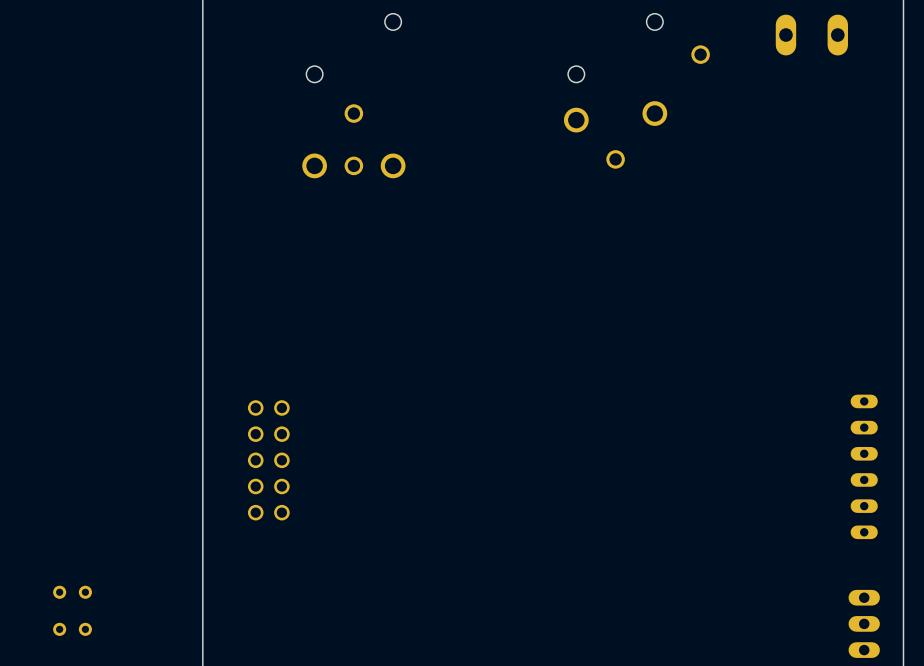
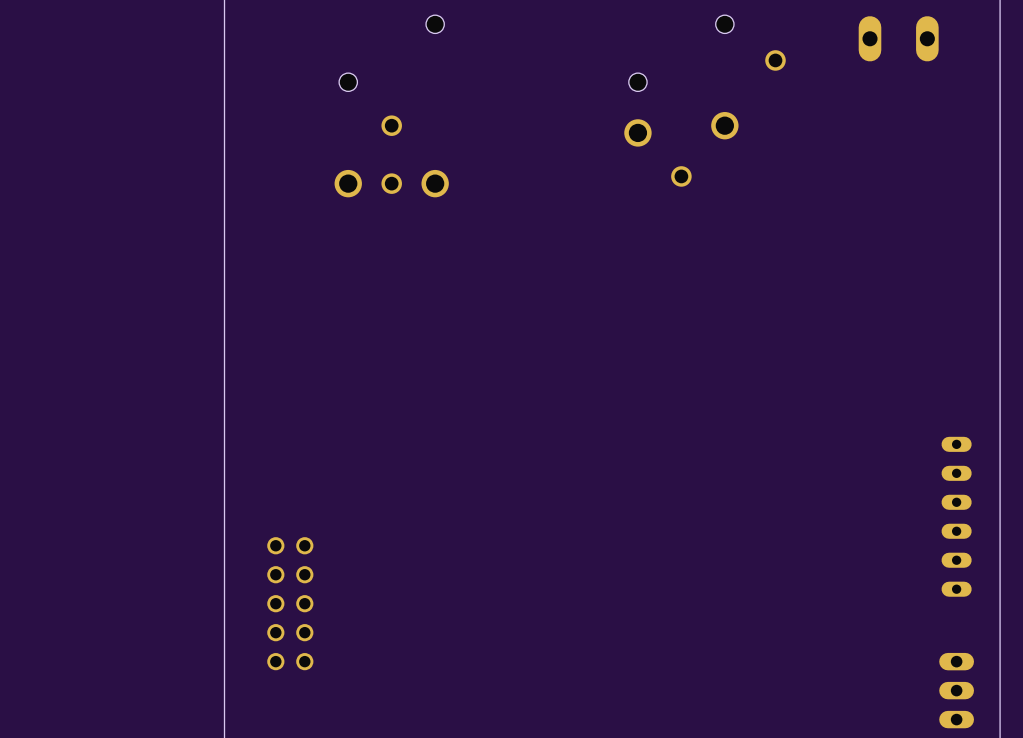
part position: (268, 460) -> (290, 603)
part: (72, 610) -> none

